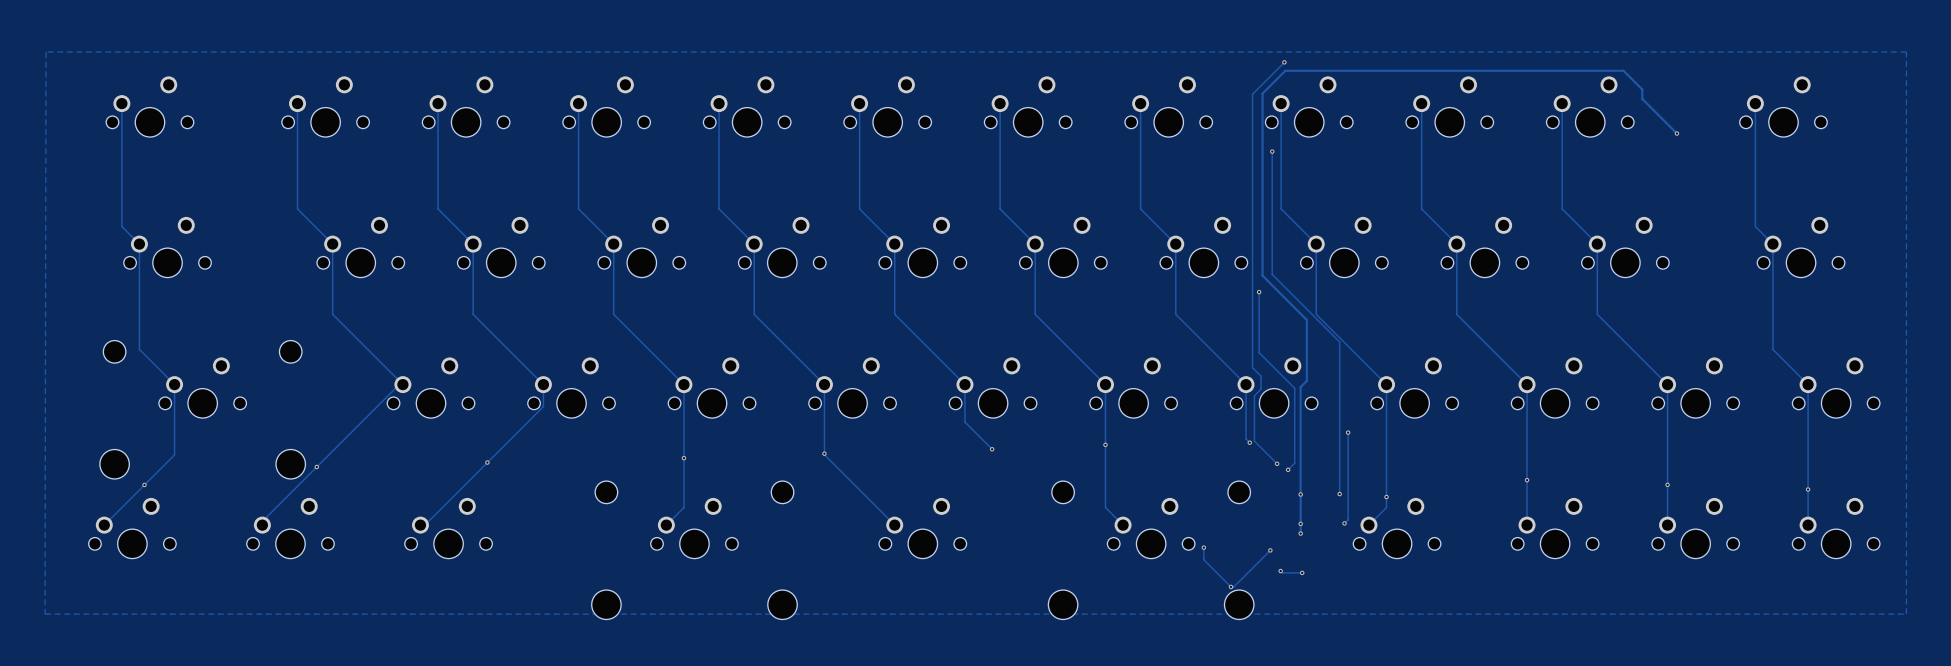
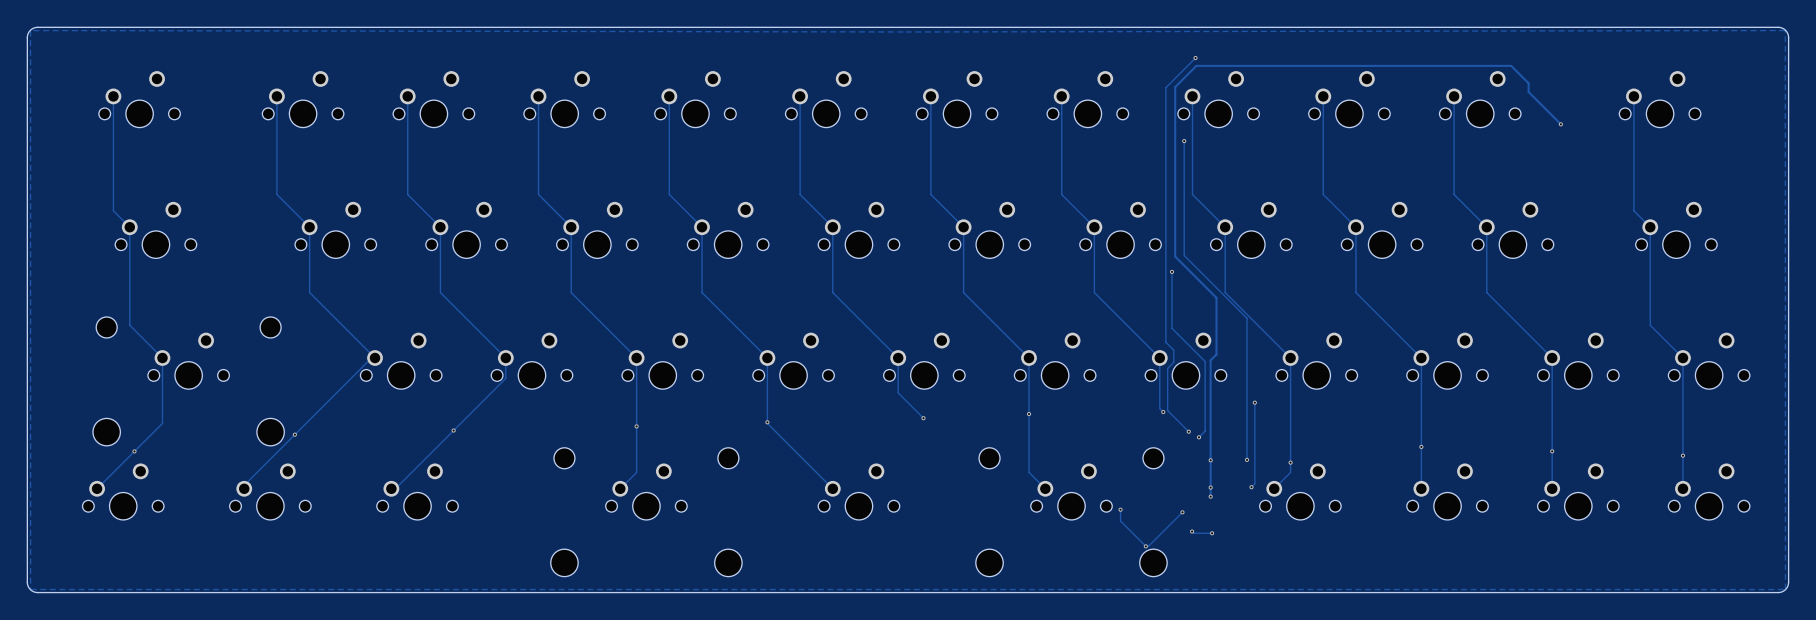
board edge: none -> (37, 27) (1780, 27) (1786, 31) (1788, 37) (1788, 584) (1784, 590) (1778, 592) (34, 592) (29, 588) (27, 582) (27, 37) (30, 30) (37, 27)
zone outline: (45, 52) (45, 614) (1906, 614) (1906, 52) (45, 52) -> (1785, 30) (30, 30) (30, 589) (1785, 589) (1785, 30)

